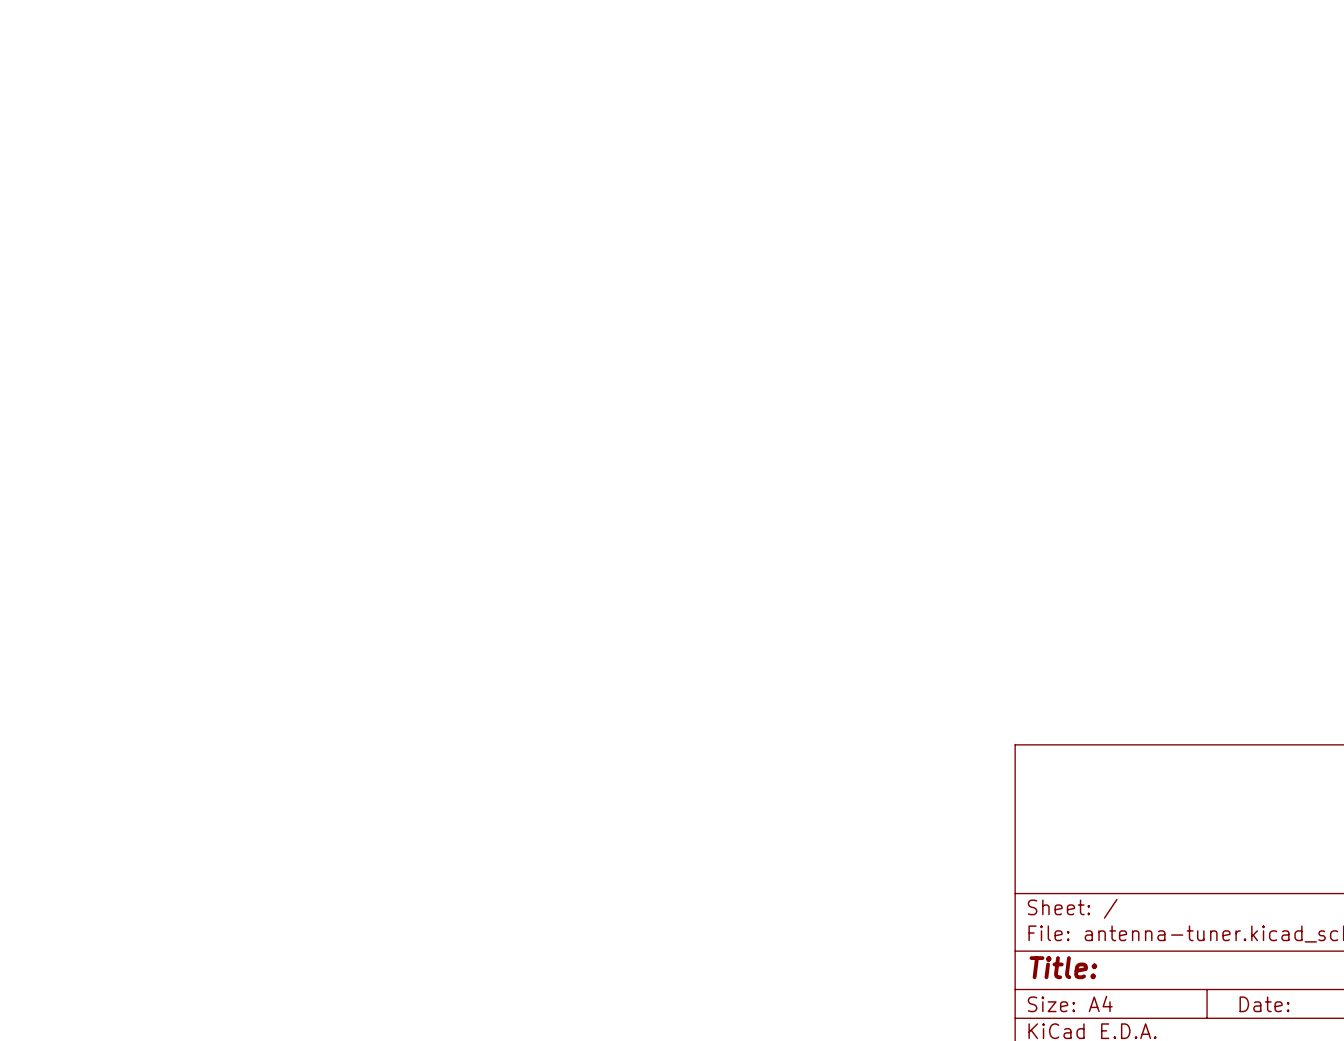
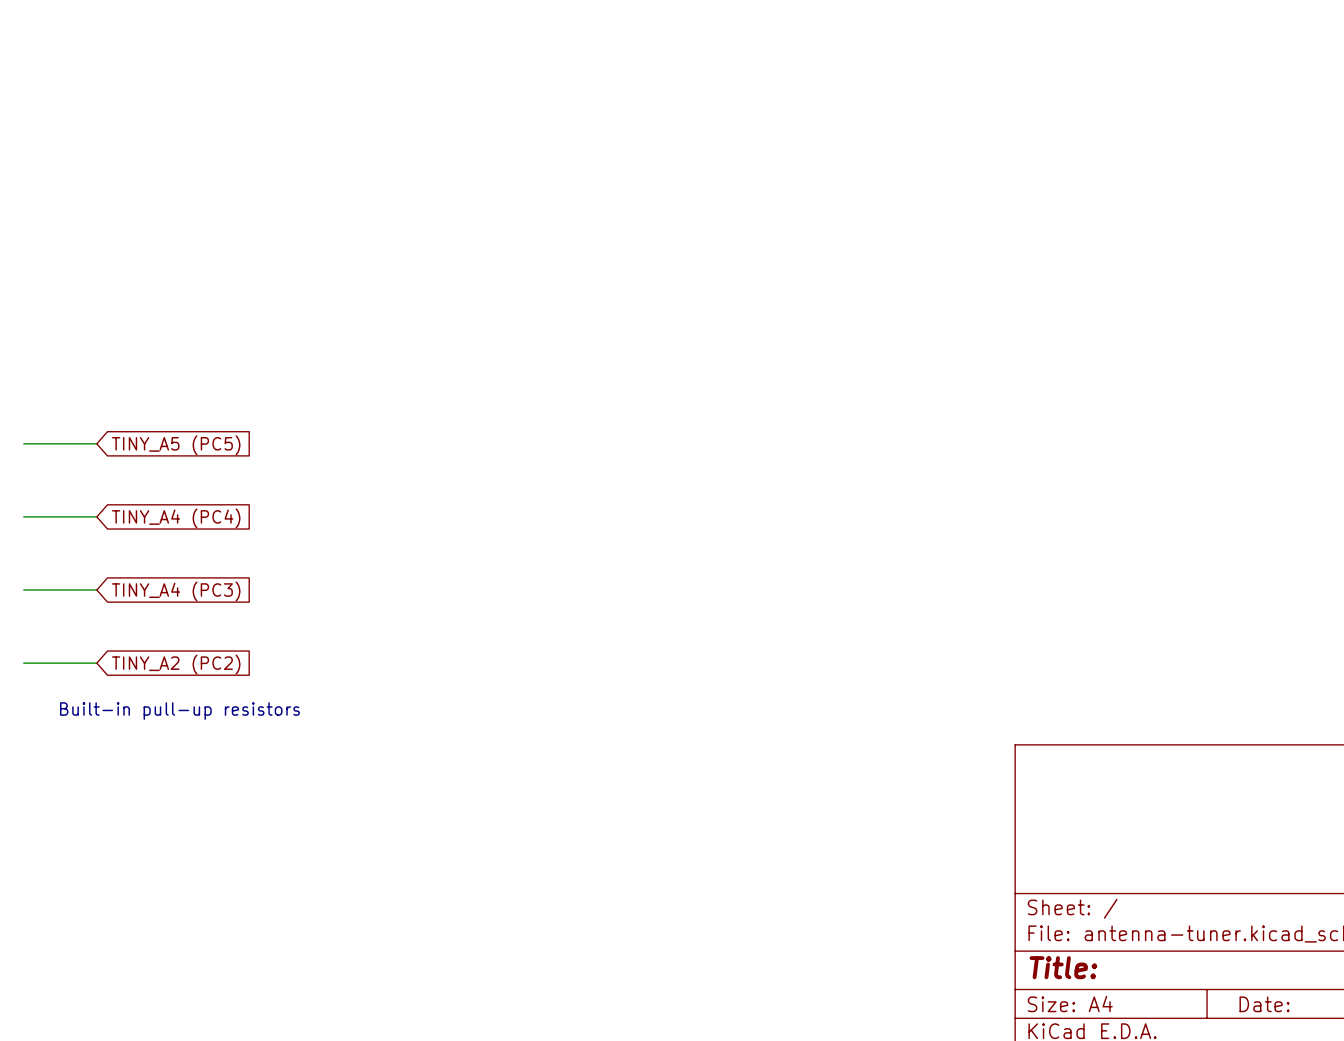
wire: none -> (23, 443) (96, 443)
global label: none -> TINY_A5 (PC5) (176, 445)
wire: none -> (23, 516) (96, 516)
global label: none -> TINY_A4 (PC4) (176, 518)
wire: none -> (23, 590) (96, 590)
global label: none -> TINY_A4 (PC3) (176, 591)
wire: none -> (23, 663) (96, 663)
global label: none -> TINY_A2 (PC2) (176, 664)
text: none -> Built-in pull-up resistors (179, 711)

